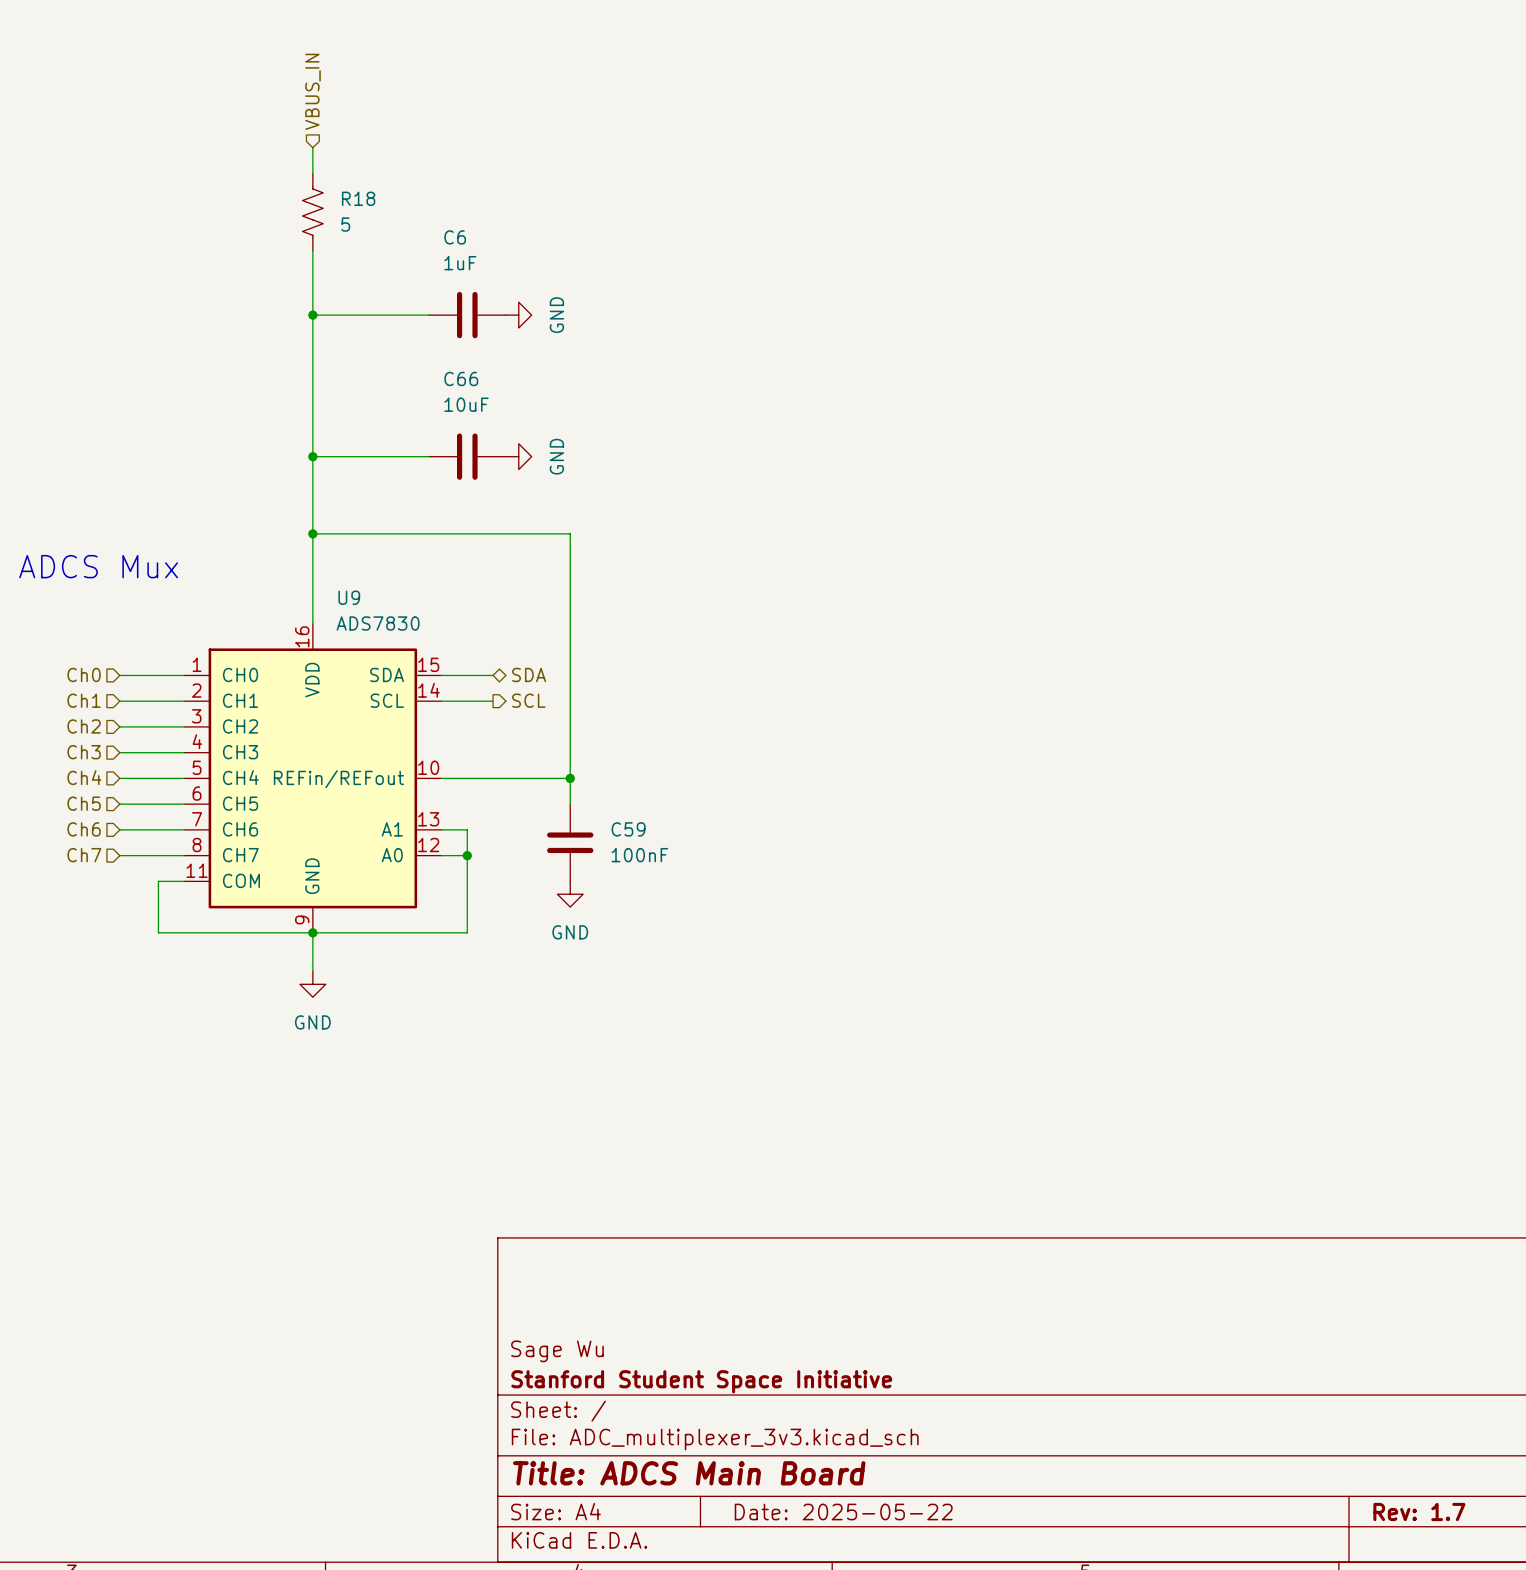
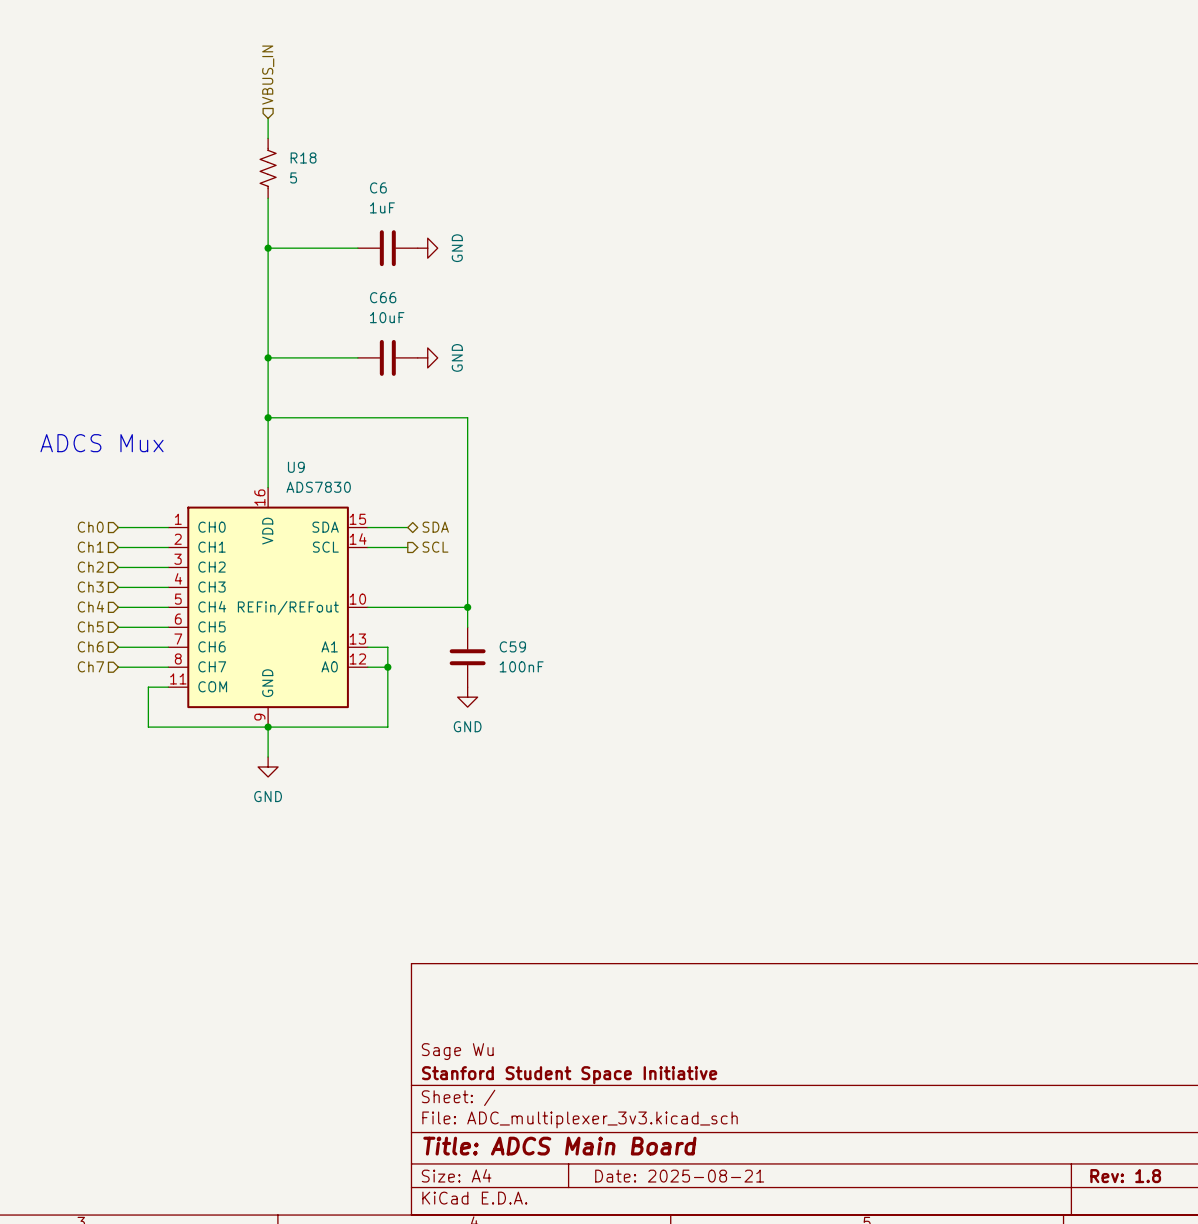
title block: Date: 2025-05-22 (843, 1512) -> Date: 2025-08-21 (679, 1176)
title block: Rev: 1.7 (1419, 1512) -> Rev: 1.8 (1125, 1176)

